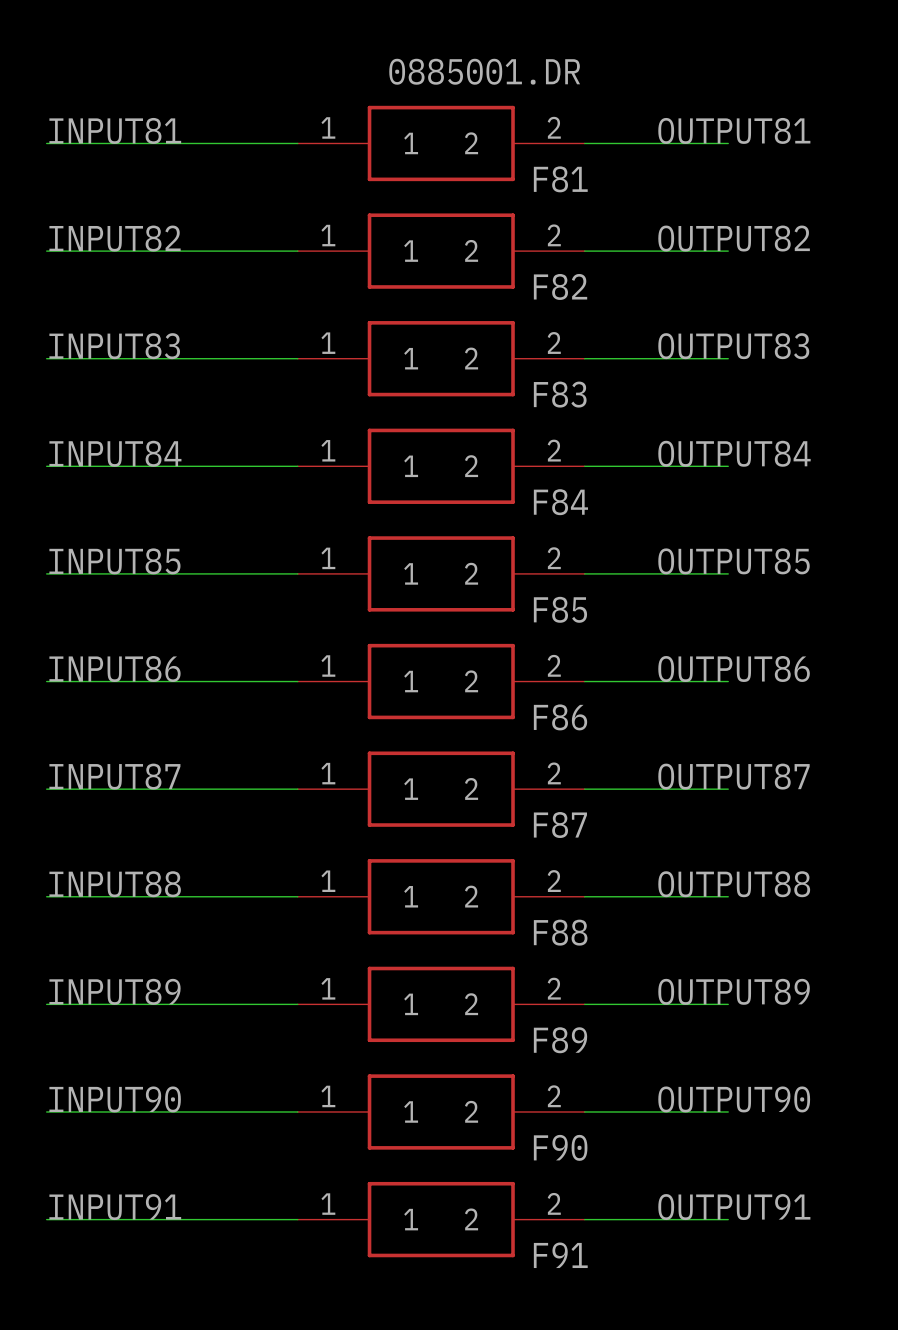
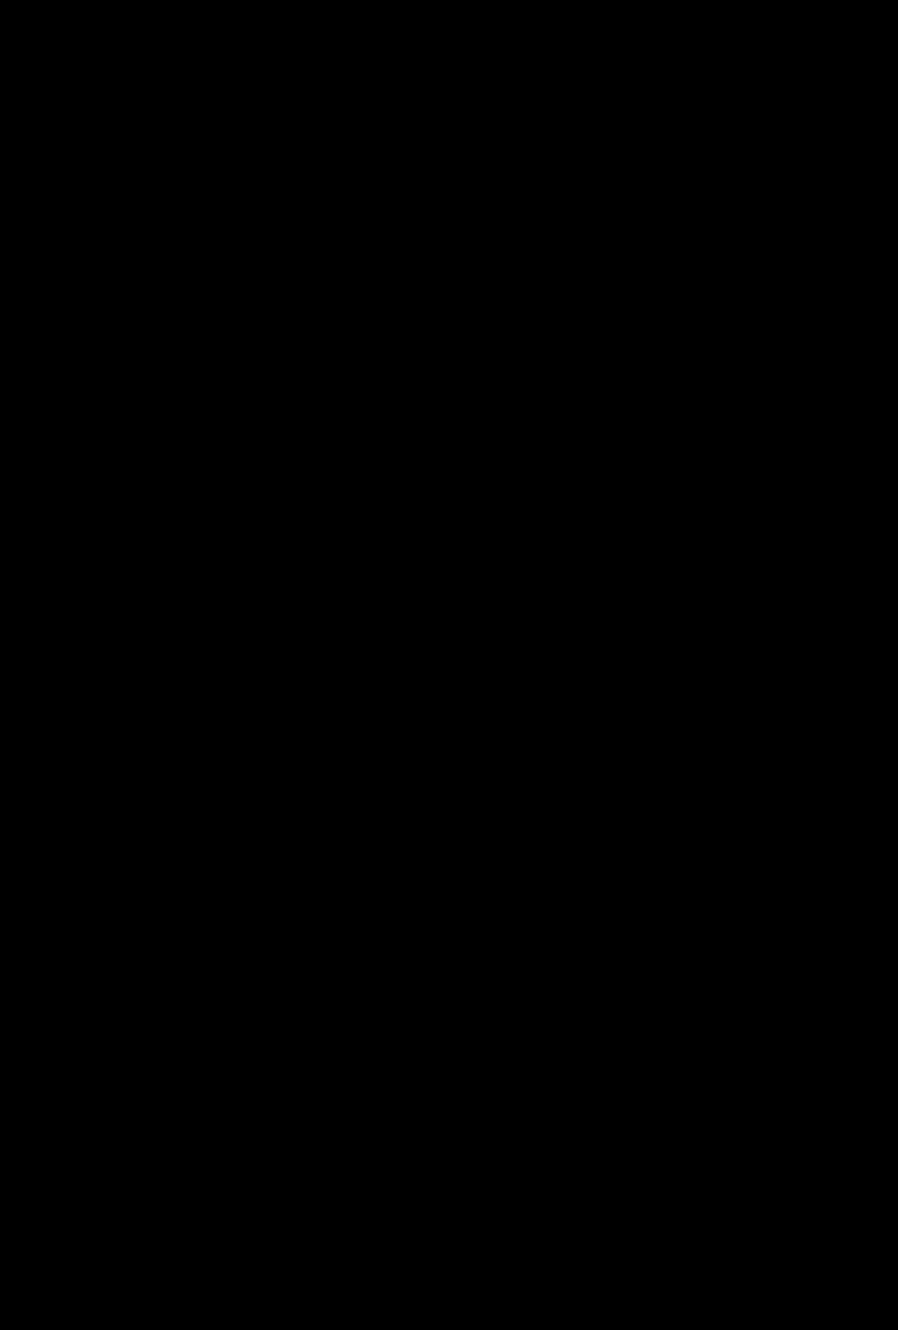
label: INPUT81 (115, 130) -> none
label: OUTPUT81 (734, 130) -> none
wire: (46, 143) (297, 143) -> none
F81: 0885001.DR (441, 143) -> none
wire: (584, 143) (728, 143) -> none
label: INPUT82 (115, 238) -> none
label: OUTPUT82 (734, 238) -> none
wire: (46, 251) (297, 251) -> none
F82: (441, 251) -> none
wire: (584, 251) (728, 251) -> none
label: INPUT83 (114, 346) -> none
label: OUTPUT83 (733, 346) -> none
wire: (46, 358) (297, 358) -> none
F83: (441, 358) -> none
wire: (584, 358) (728, 358) -> none
label: INPUT84 (115, 453) -> none
label: OUTPUT84 (734, 453) -> none
wire: (46, 466) (297, 466) -> none
F84: (441, 466) -> none
wire: (584, 466) (728, 466) -> none
label: INPUT85 (114, 561) -> none
label: OUTPUT85 (734, 561) -> none
wire: (46, 573) (297, 573) -> none
F85: (441, 573) -> none
wire: (584, 573) (728, 573) -> none
label: INPUT86 (115, 668) -> none
label: OUTPUT86 (734, 668) -> none
wire: (46, 681) (297, 681) -> none
F86: (441, 681) -> none
wire: (584, 681) (728, 681) -> none
label: INPUT87 (114, 776) -> none
label: OUTPUT87 (733, 776) -> none
wire: (46, 789) (297, 789) -> none
F87: (441, 789) -> none
wire: (584, 789) (728, 789) -> none
label: INPUT88 (115, 884) -> none
label: OUTPUT88 (734, 884) -> none
wire: (46, 896) (297, 896) -> none
F88: (441, 896) -> none
wire: (584, 896) (728, 896) -> none
label: INPUT89 (115, 991) -> none
label: OUTPUT89 (734, 991) -> none
wire: (46, 1004) (297, 1004) -> none
F89: (441, 1004) -> none
wire: (584, 1004) (728, 1004) -> none
label: INPUT90 (115, 1099) -> none
label: OUTPUT90 (734, 1099) -> none
wire: (46, 1111) (297, 1111) -> none
F90: (441, 1111) -> none
wire: (584, 1111) (728, 1111) -> none
label: INPUT91 (115, 1207) -> none
label: OUTPUT91 (734, 1207) -> none
wire: (46, 1219) (297, 1219) -> none
F91: (441, 1219) -> none
wire: (584, 1219) (728, 1219) -> none

